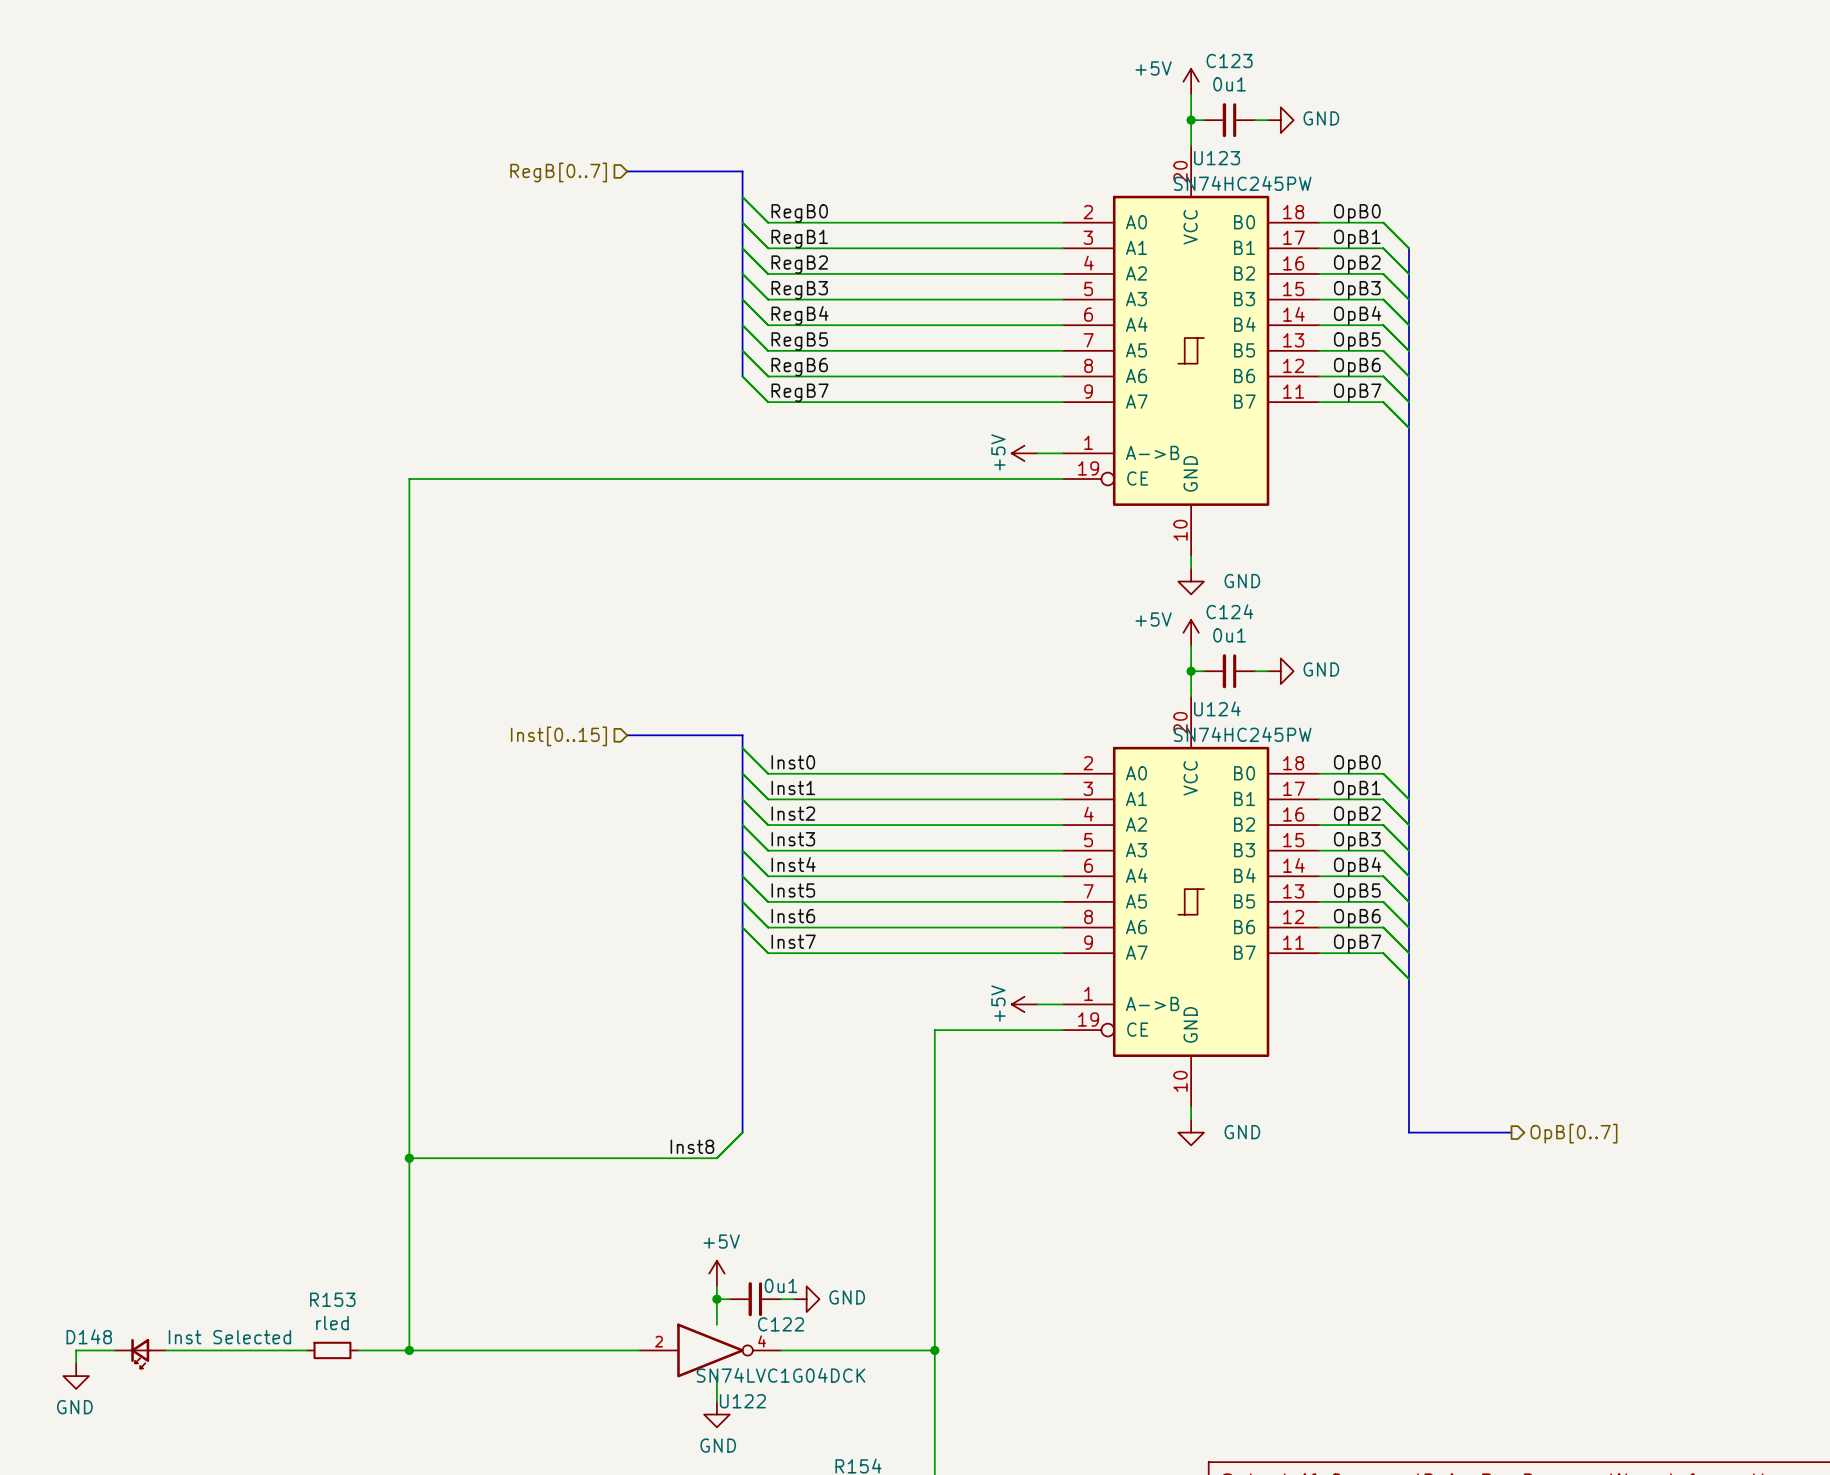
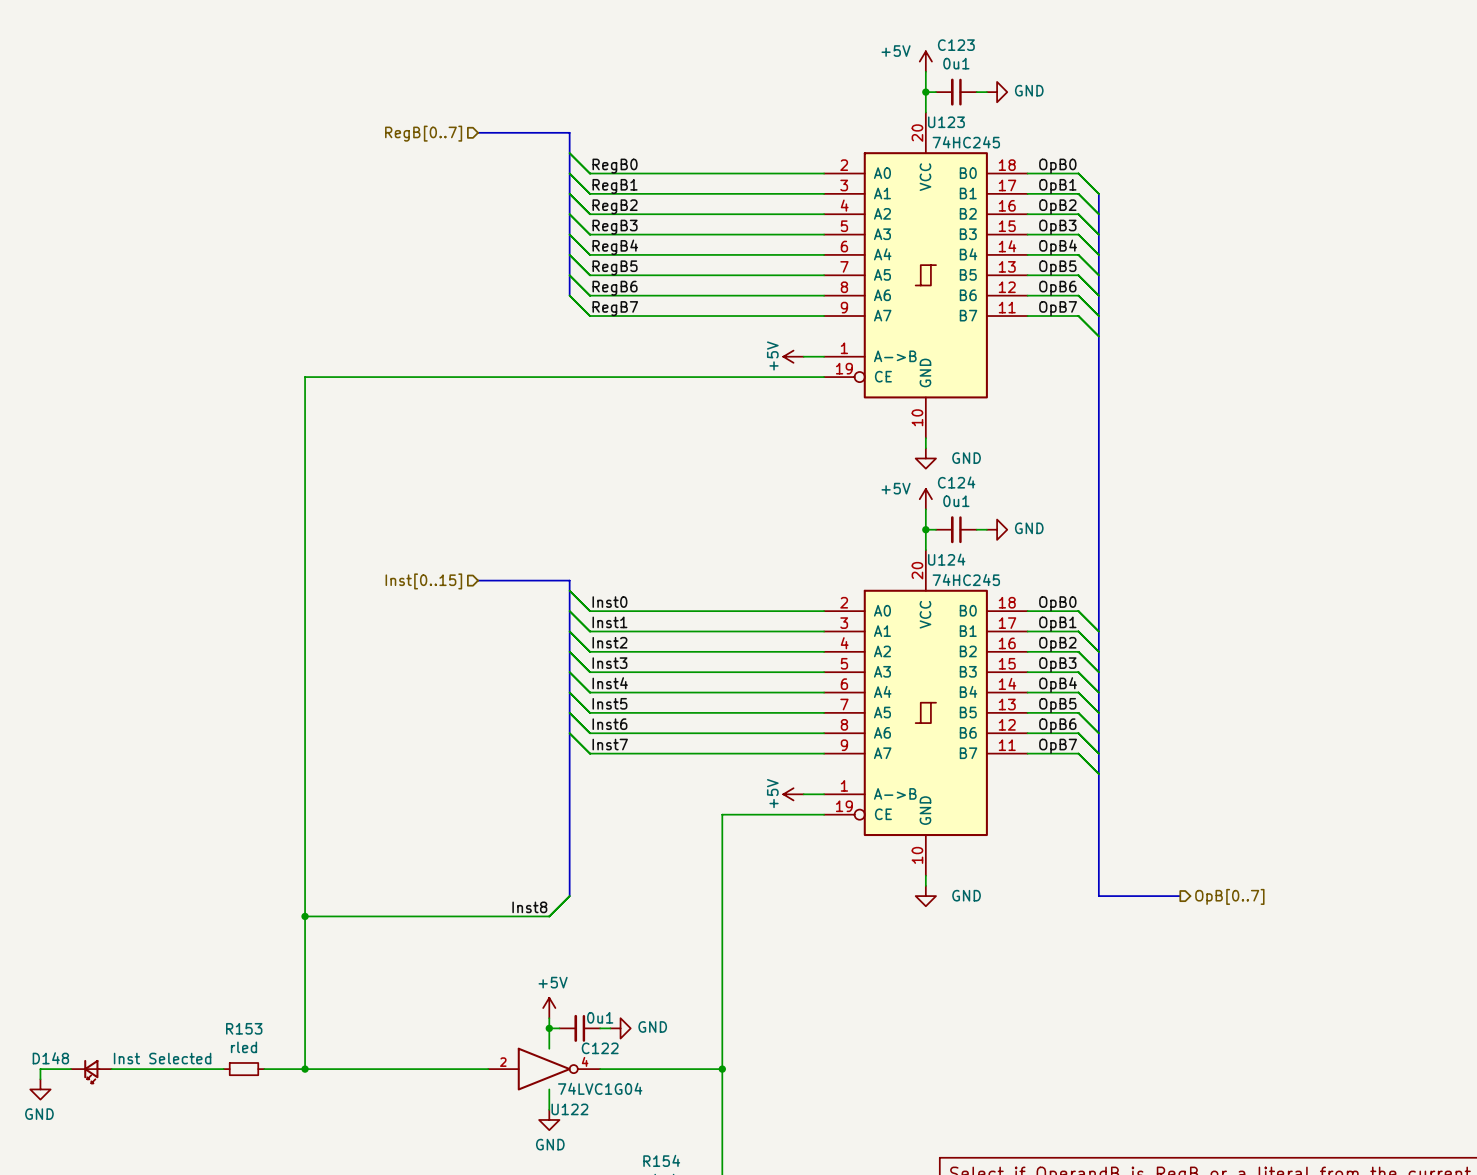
U123 value: SN74HC245PW (1242, 183) -> 74HC245 (966, 142)
U124 value: SN74HC245PW (1242, 734) -> 74HC245 (966, 579)
U122 value: SN74LVC1G04DCK (781, 1375) -> 74LVC1G04 (600, 1088)

